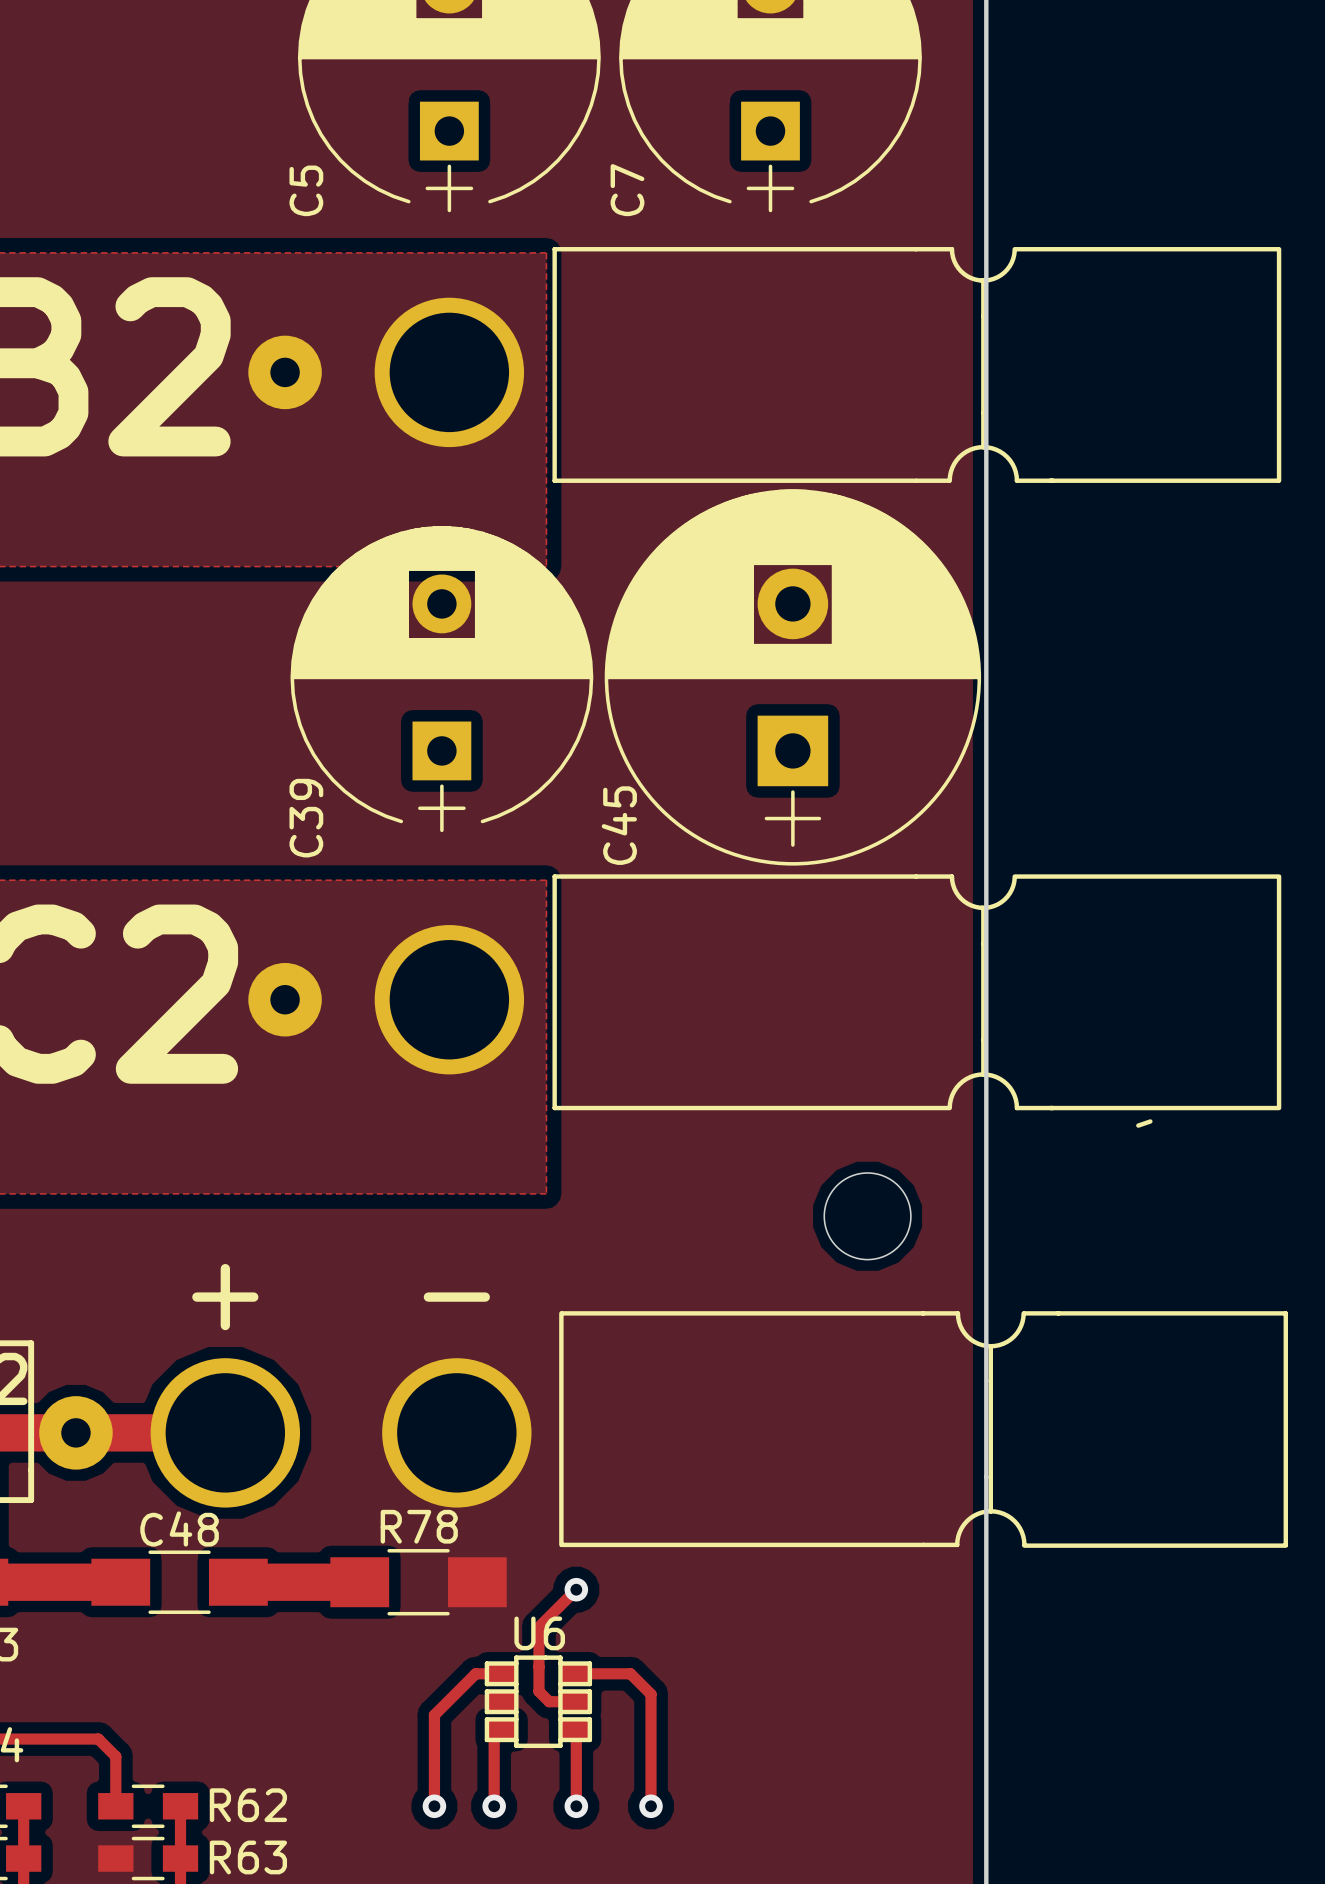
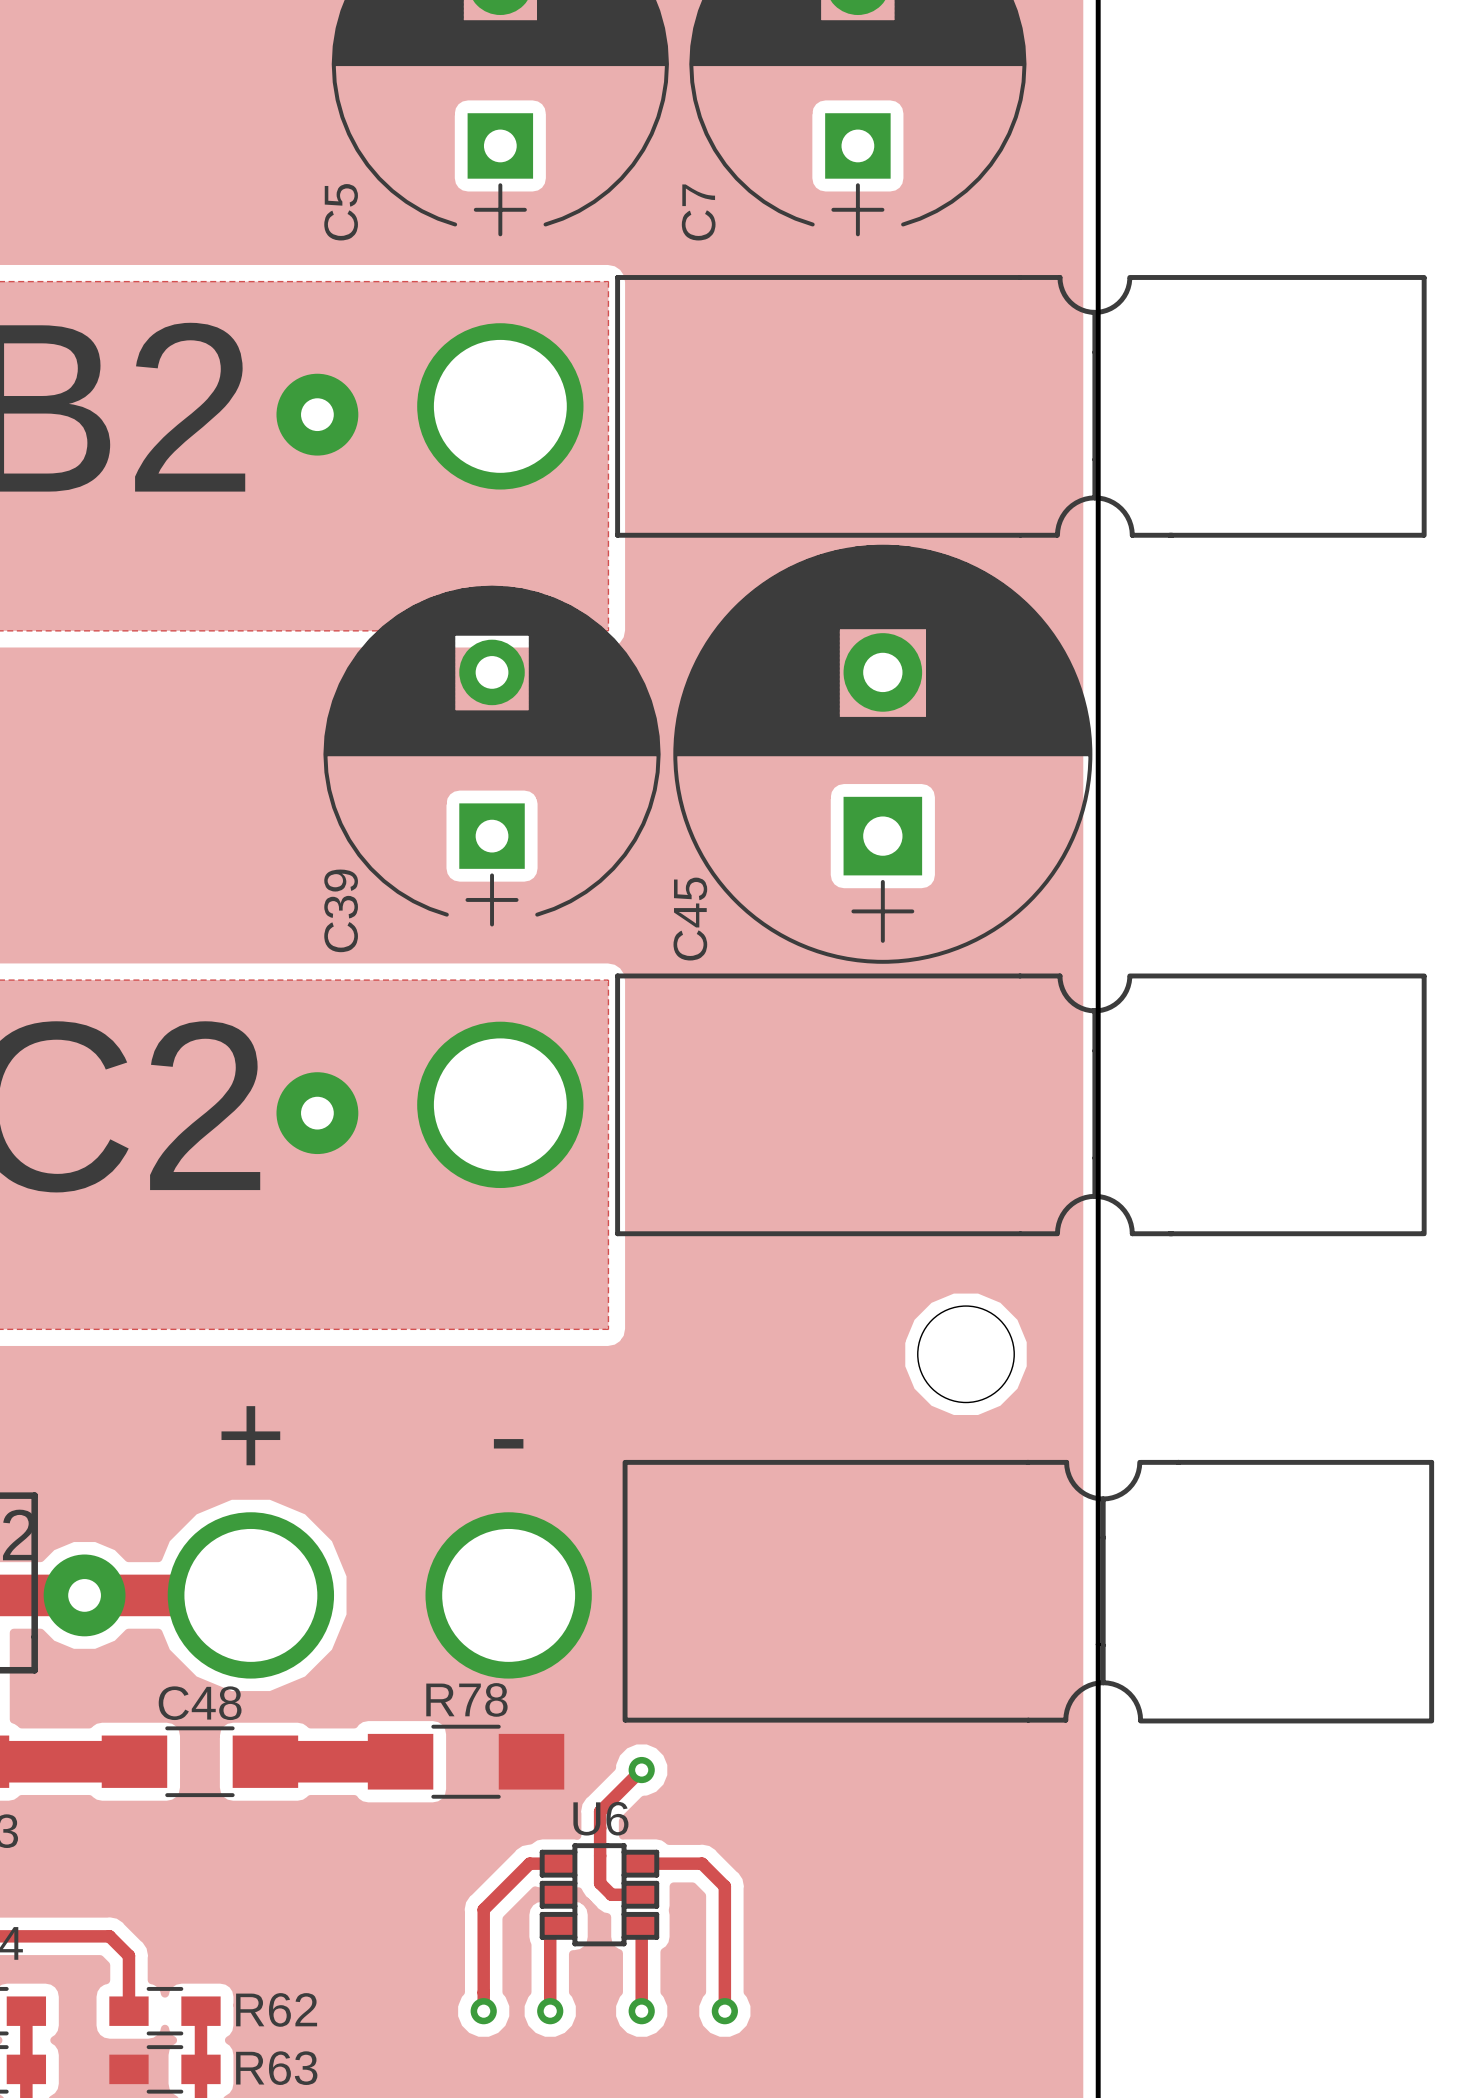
part footprint: [374, 247, 1282, 483] -> [417, 275, 1427, 538]
part footprint: [374, 874, 1282, 1111] -> [417, 973, 1427, 1237]
part: (1144, 1123) -> none

